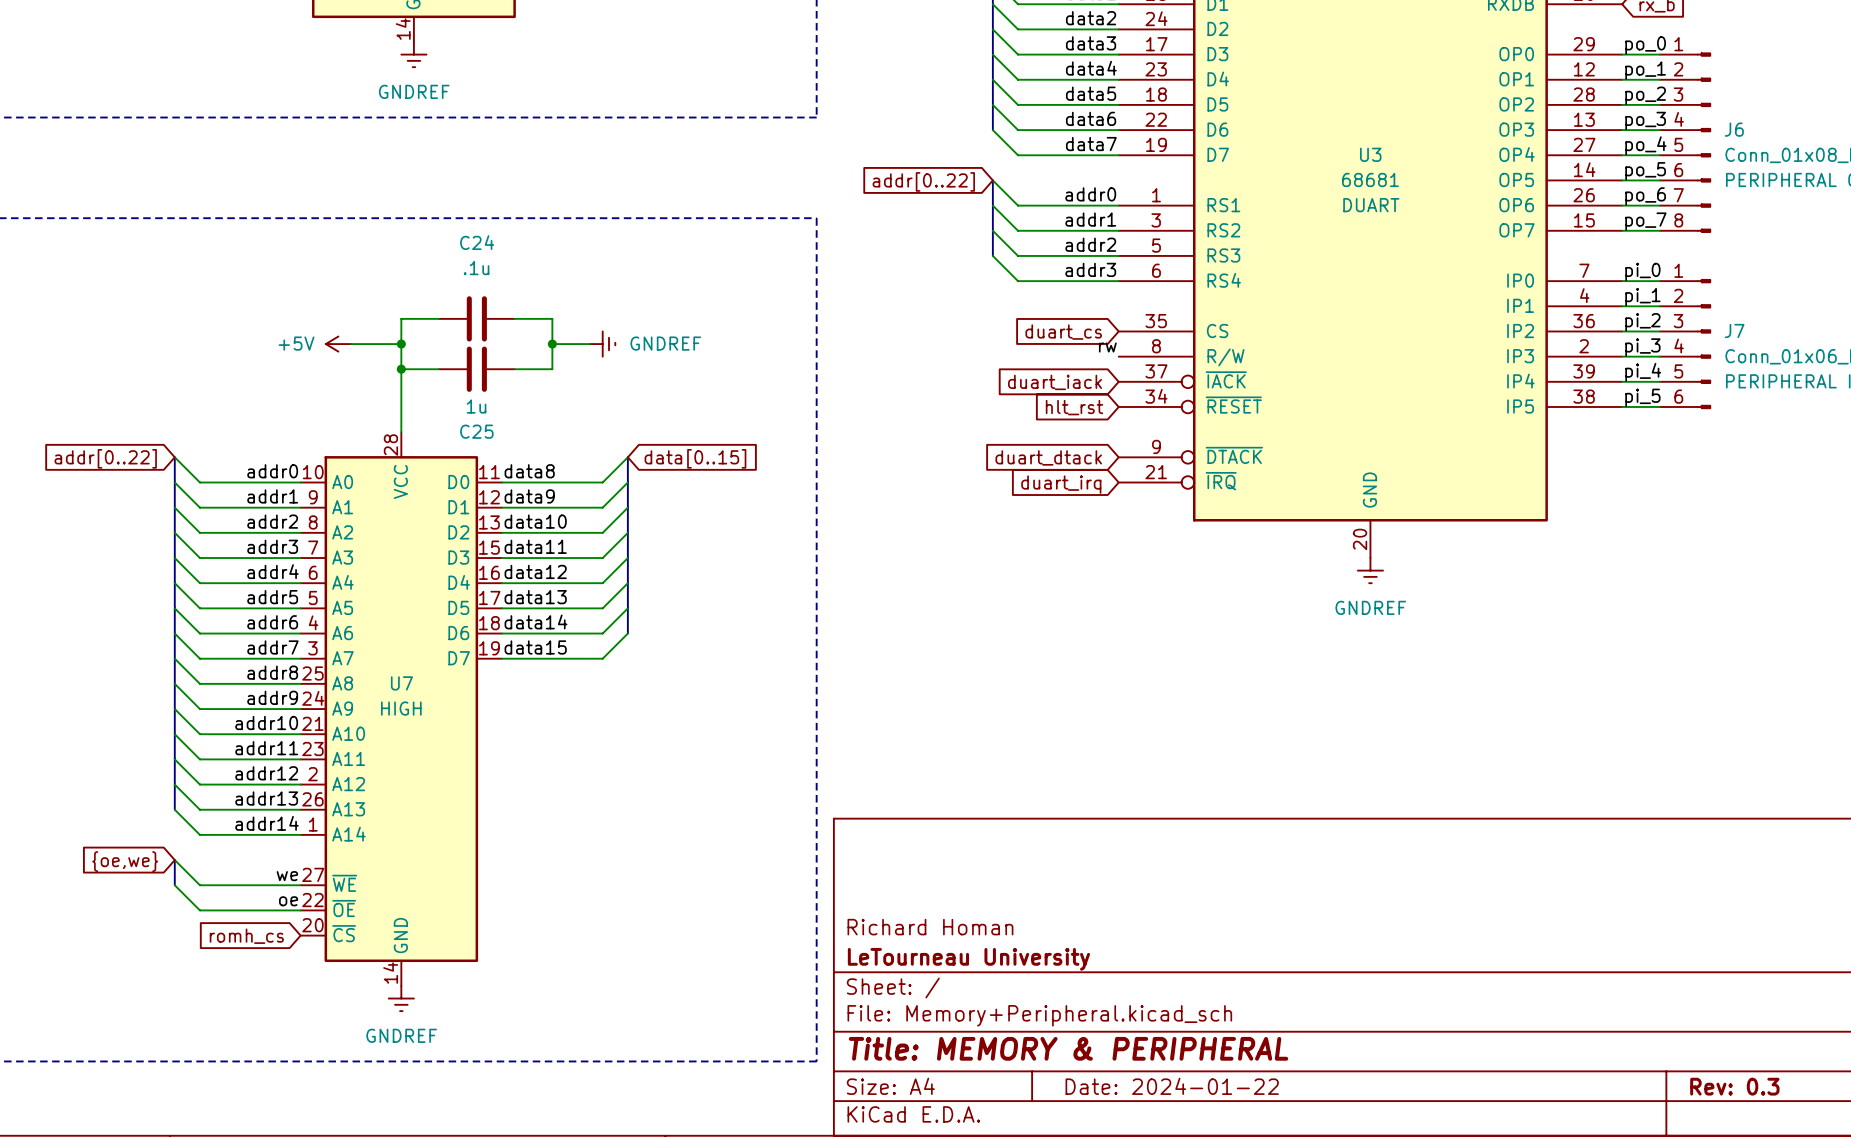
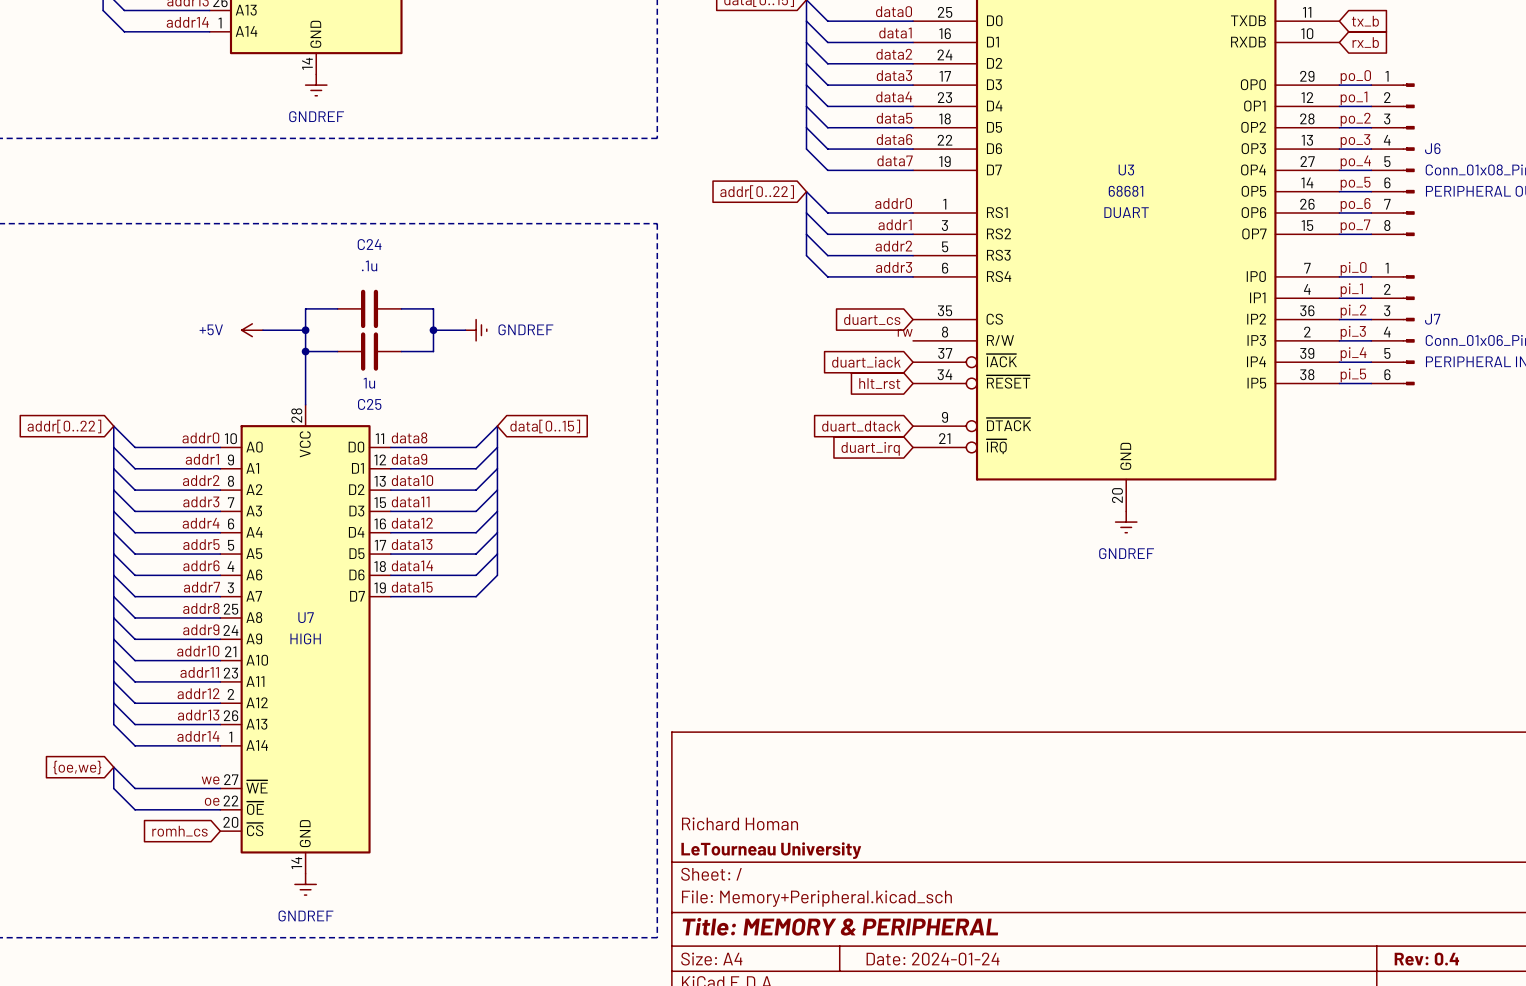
title block: Date: 2024-01-22 (1172, 1086) -> Date: 2024-01-24 (933, 959)
title block: Rev: 0.3 (1734, 1086) -> Rev: 0.4 (1426, 959)

